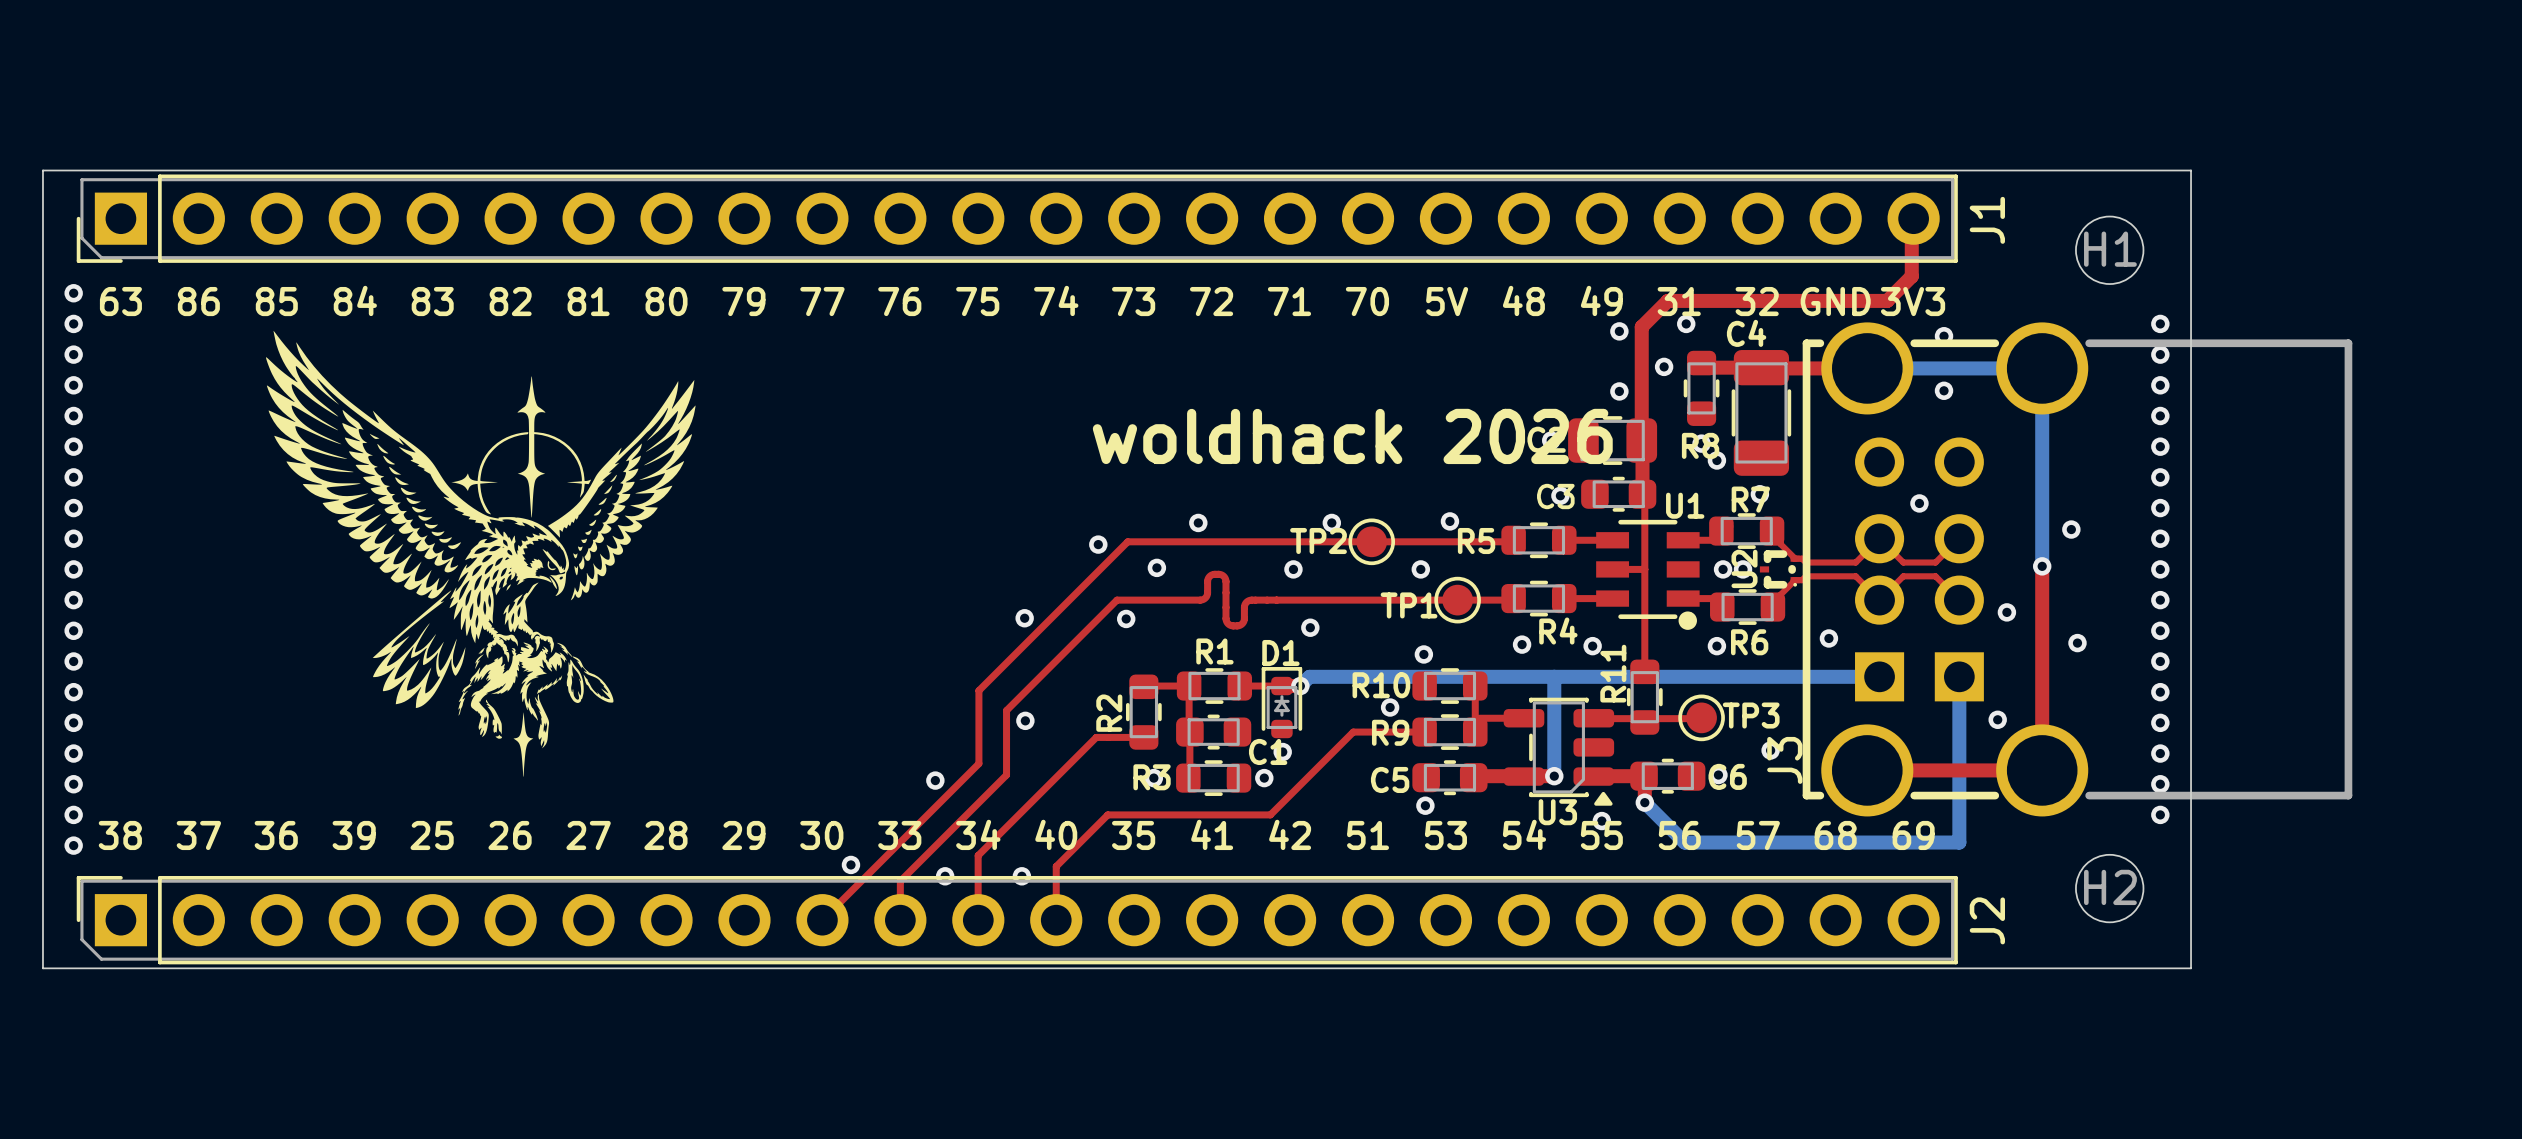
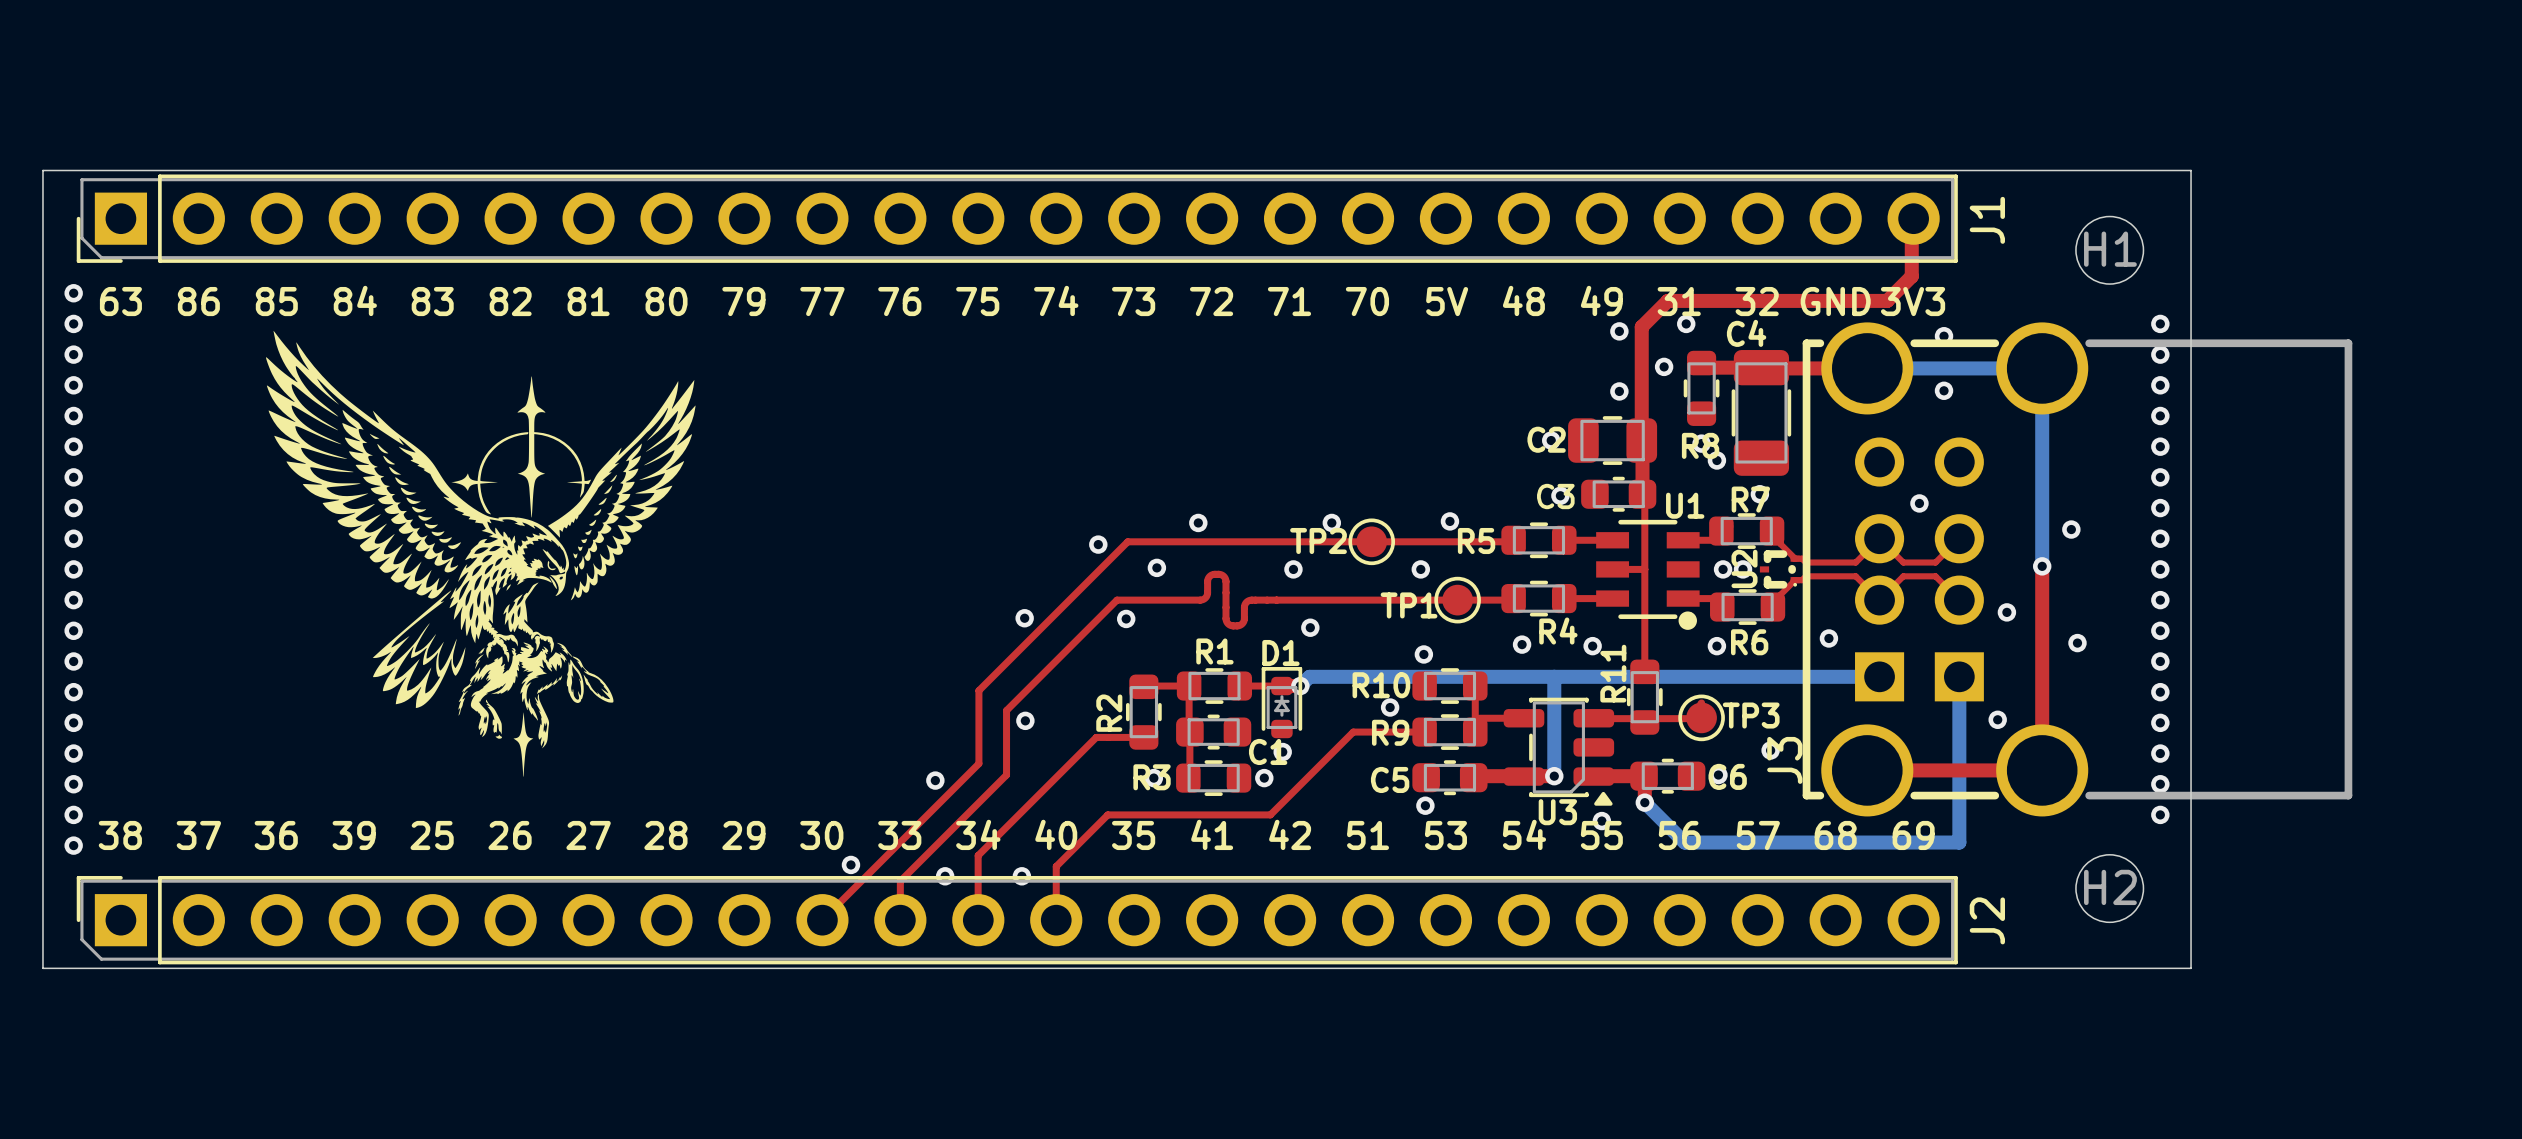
text: woldhack 2026 (1352, 436) -> none
top track: none -> (1701, 702) (1700, 703)

